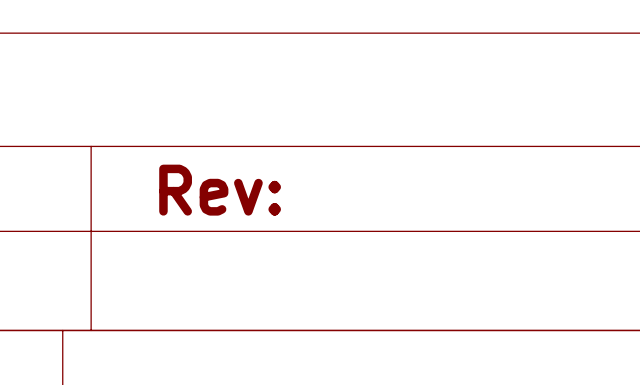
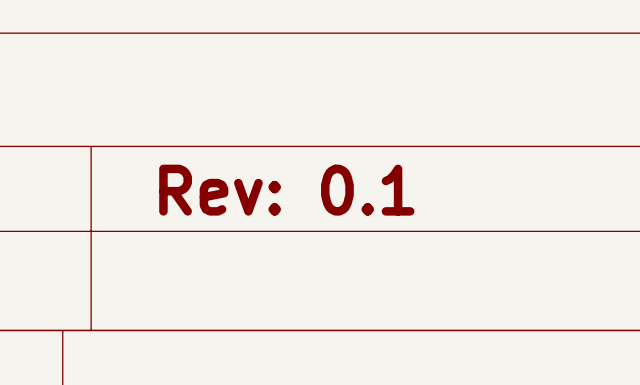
title block: Rev: (220, 190) -> Rev: 0.1 (286, 190)

